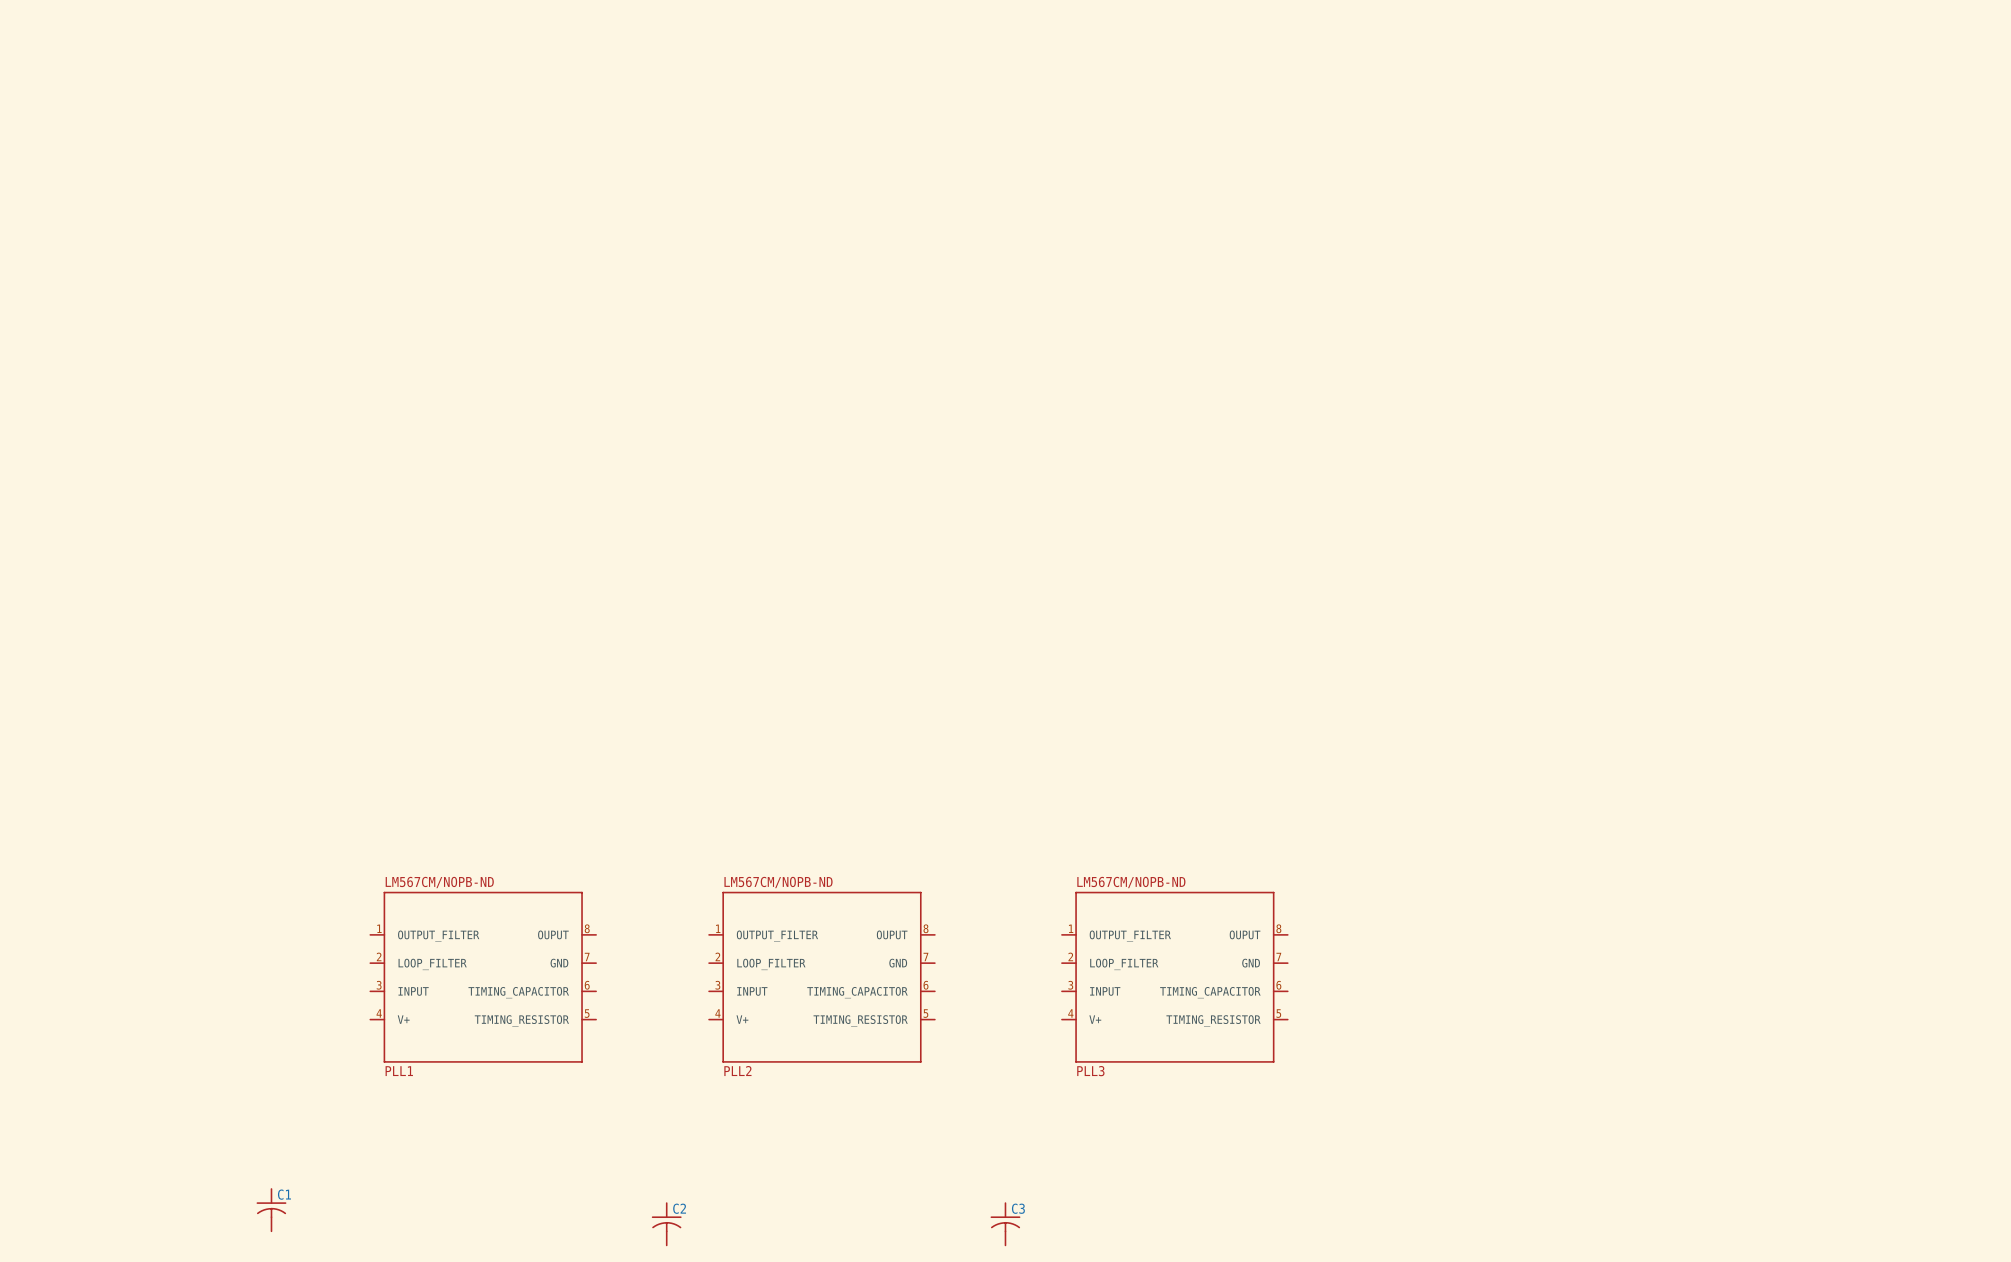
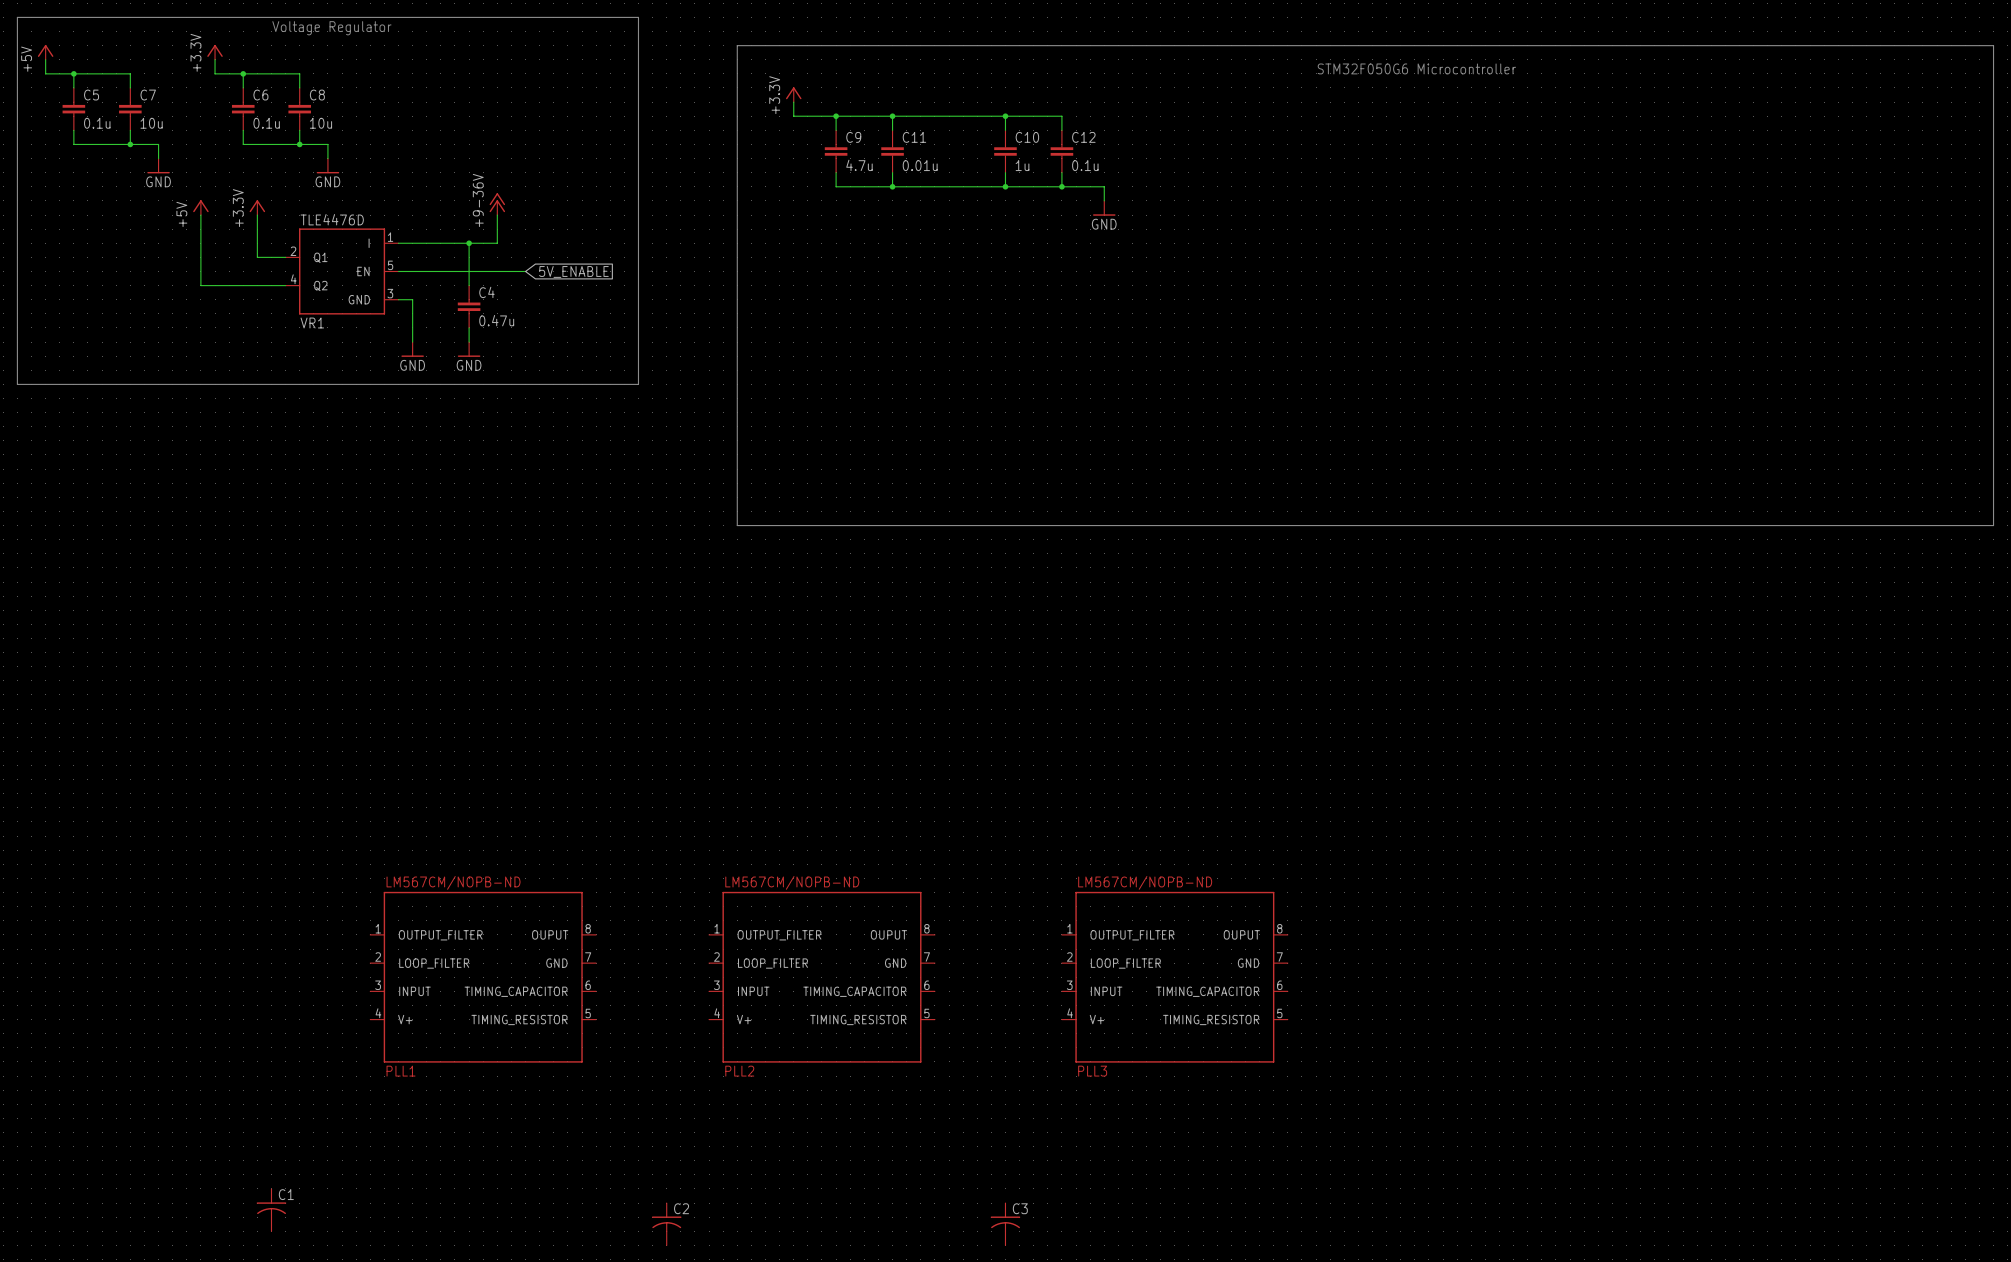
line: none -> (17, 17) (638, 17) (638, 384) (17, 384) (17, 17)
text: none -> Voltage Regulator (331, 28)
line: none -> (737, 45) (1993, 45) (1993, 525) (737, 525) (737, 45)
power symbol: none -> +5V (45, 52)
power symbol: none -> +3.3V (215, 52)
wire: none -> (45, 59) (45, 73) (130, 73) (130, 87)
wire: none -> (215, 59) (215, 73) (299, 73) (299, 87)
text: none -> STM32F050G6 Microcontroller (1416, 68)
wire: none -> (73, 73) (73, 87)
junction: none -> (73, 73)
wire: none -> (243, 73) (243, 87)
junction: none -> (243, 73)
power symbol: none -> +3.3V (793, 94)
wire: none -> (793, 102) (793, 116) (1061, 116) (1061, 130)
C5: none -> 0.1u (73, 109)
C7: none -> 10u (130, 109)
C6: none -> 0.1u (243, 109)
C8: none -> 10u (299, 109)
wire: none -> (836, 116) (836, 130)
junction: none -> (836, 116)
wire: none -> (892, 116) (892, 130)
junction: none -> (892, 116)
wire: none -> (1005, 116) (1005, 130)
junction: none -> (1005, 116)
wire: none -> (73, 130) (73, 144) (158, 144) (158, 158)
wire: none -> (130, 130) (130, 144)
wire: none -> (243, 130) (243, 144) (327, 144) (327, 158)
wire: none -> (299, 130) (299, 144)
junction: none -> (130, 144)
junction: none -> (299, 144)
C9: none -> 4.7u (836, 151)
C11: none -> 0.01u (892, 151)
C10: none -> 1u (1005, 151)
C12: none -> 0.1u (1061, 151)
power symbol: none -> GND (158, 165)
power symbol: none -> GND (327, 165)
wire: none -> (836, 172) (836, 186) (1104, 186) (1104, 200)
wire: none -> (892, 172) (892, 186)
wire: none -> (1005, 172) (1005, 186)
wire: none -> (1061, 172) (1061, 186)
junction: none -> (892, 186)
junction: none -> (1005, 186)
junction: none -> (1061, 186)
power symbol: none -> +9-36V (497, 204)
power symbol: none -> +5V (200, 207)
power symbol: none -> +3.3V (257, 207)
power symbol: none -> GND (1104, 208)
wire: none -> (200, 215) (200, 285) (285, 285)
wire: none -> (257, 215) (257, 257) (285, 257)
wire: none -> (497, 215) (497, 243) (398, 243)
wire: none -> (469, 243) (469, 285)
junction: none -> (469, 243)
VR1: none -> TLE4476D (342, 271)
wire: none -> (398, 271) (525, 271)
global label: none -> 5V_ENABLE (573, 271)
wire: none -> (398, 299) (412, 299) (412, 342)
C4: none -> 0.47u (469, 306)
wire: none -> (469, 327) (469, 342)
power symbol: none -> GND (412, 349)
power symbol: none -> GND (469, 349)

